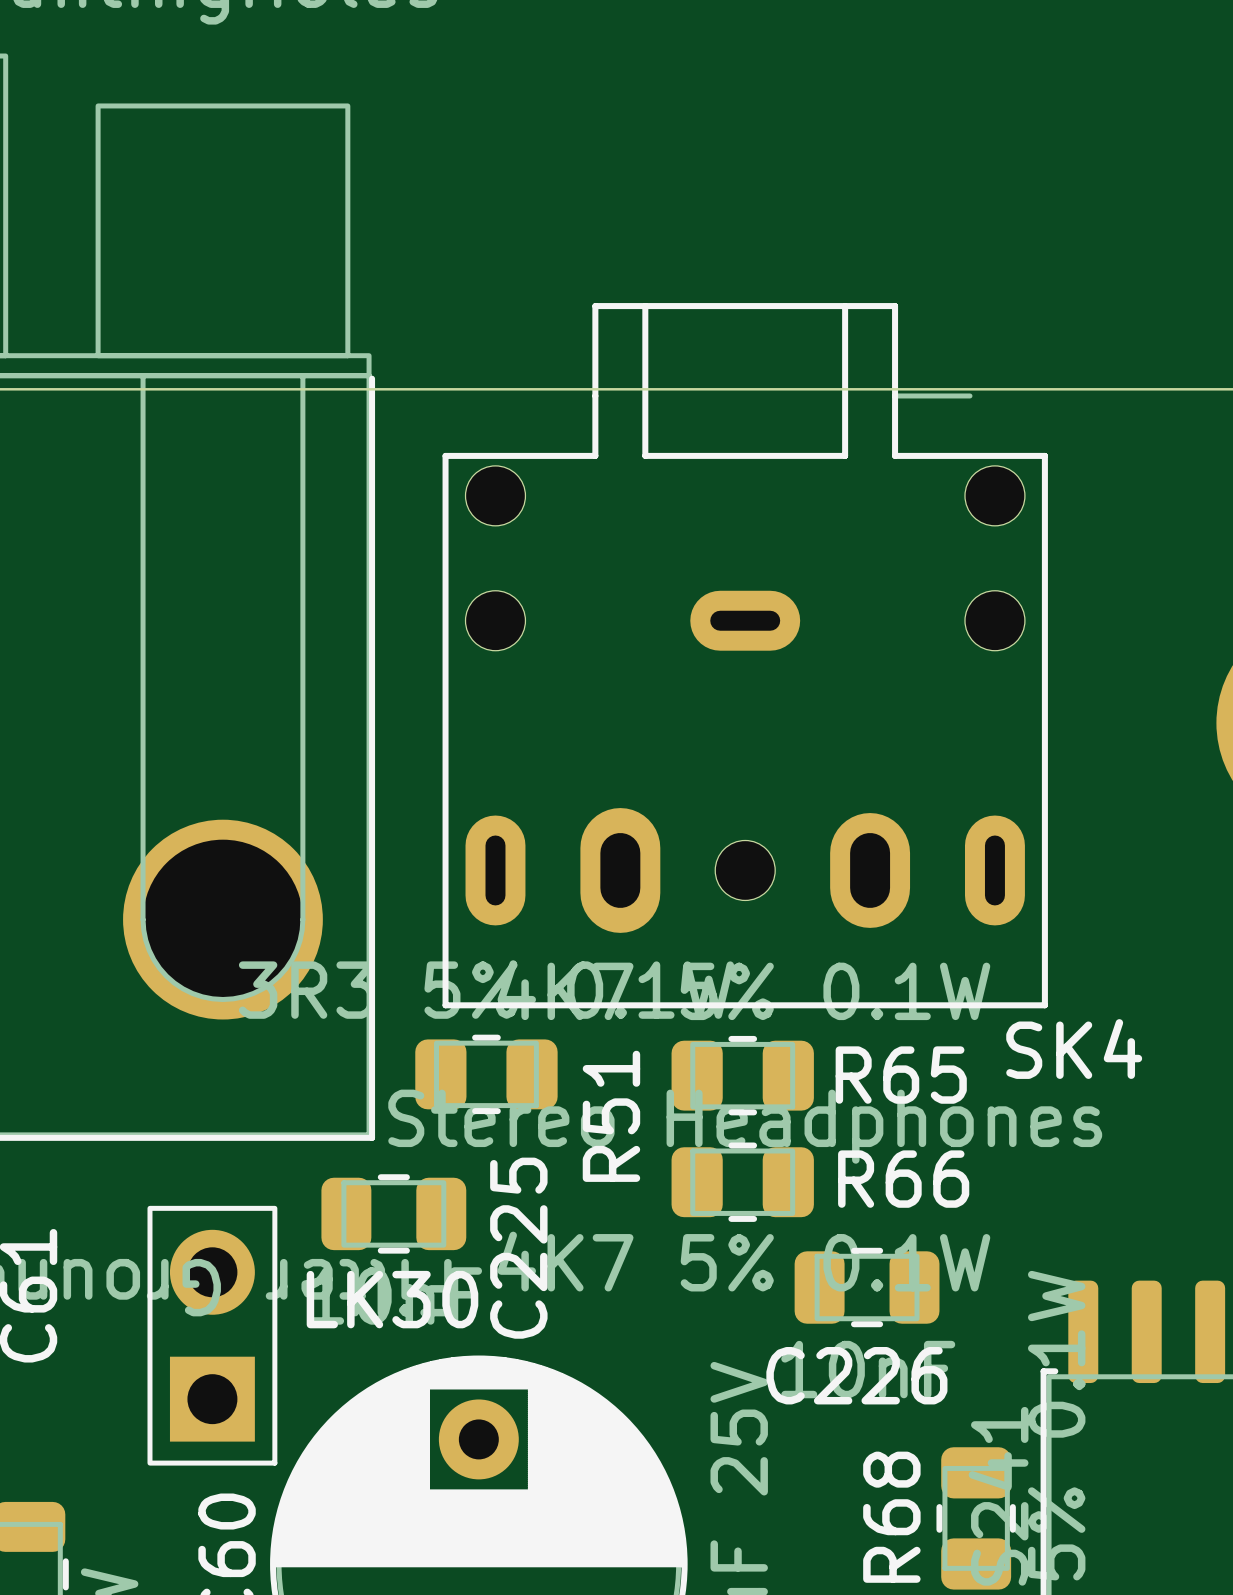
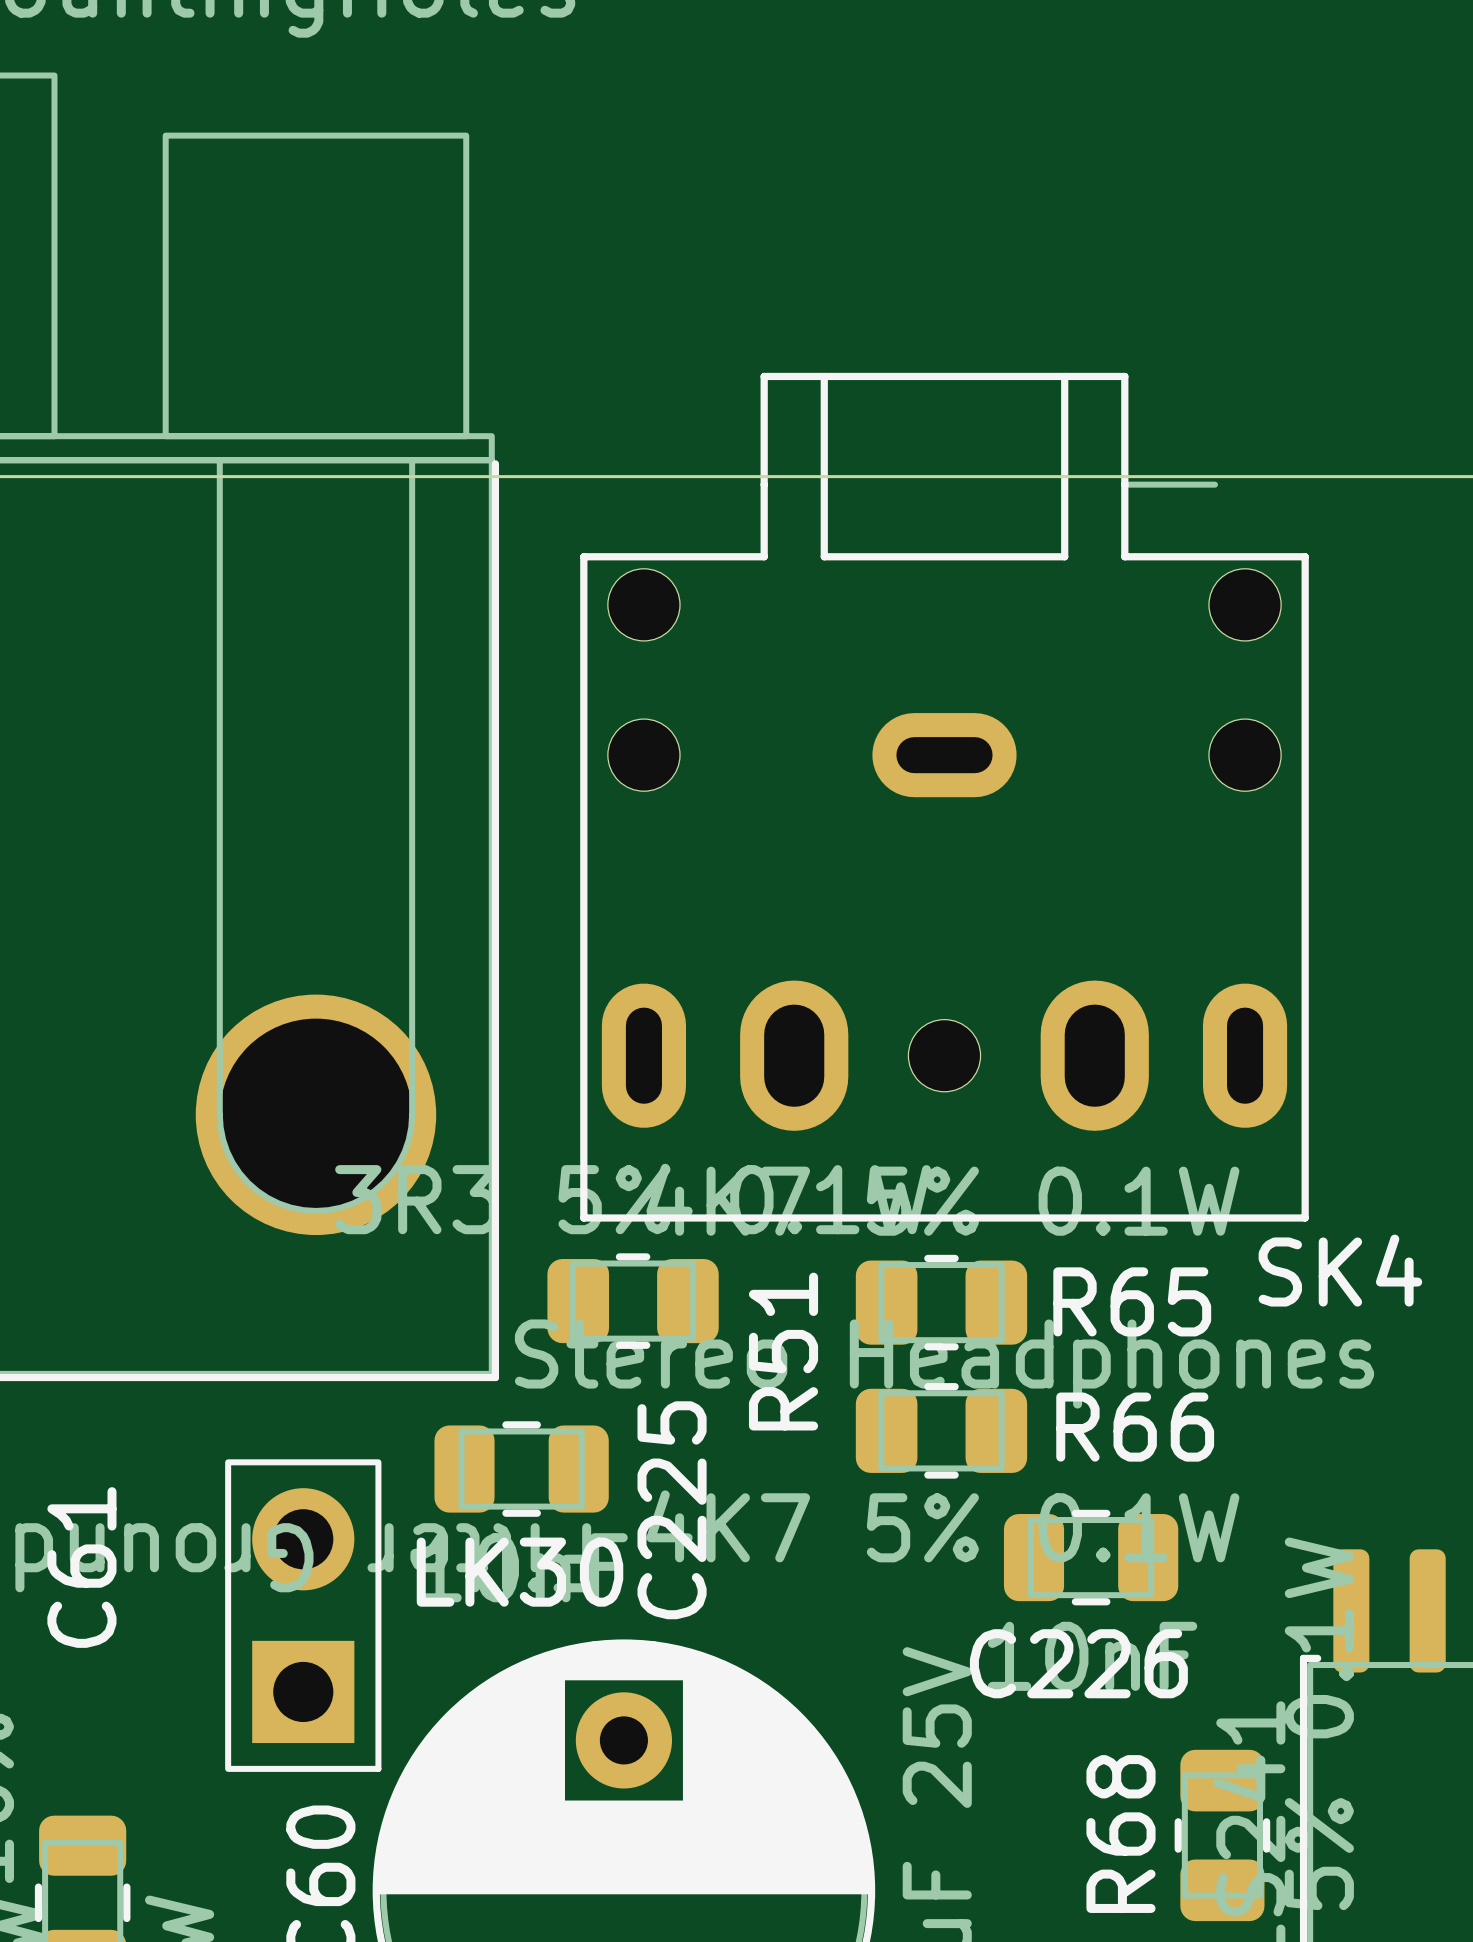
SK4 footprint: [442, 303, 1048, 1009] -> [580, 372, 1309, 1222]

